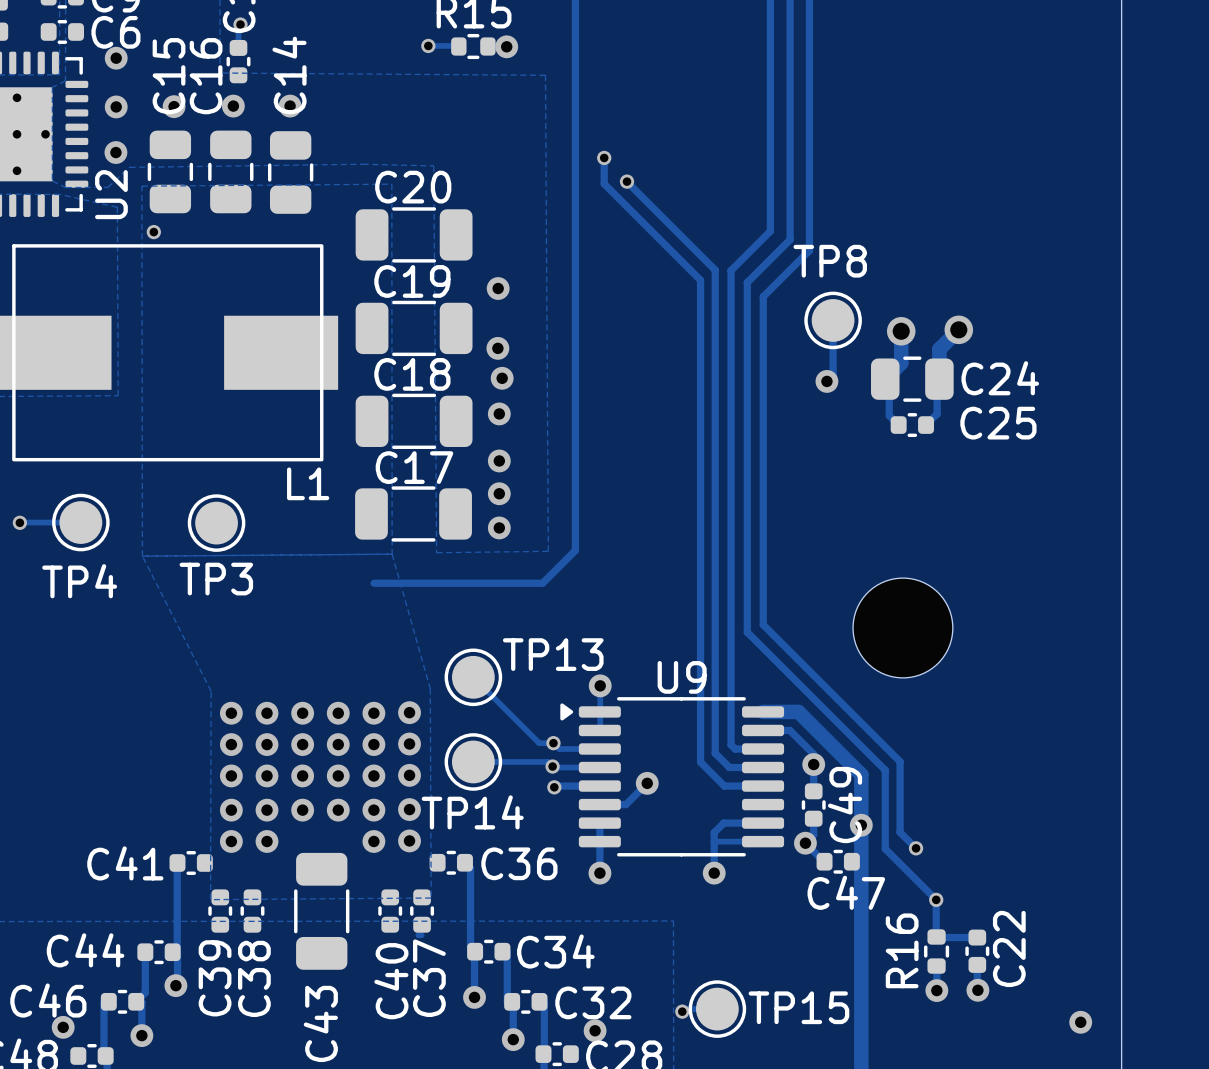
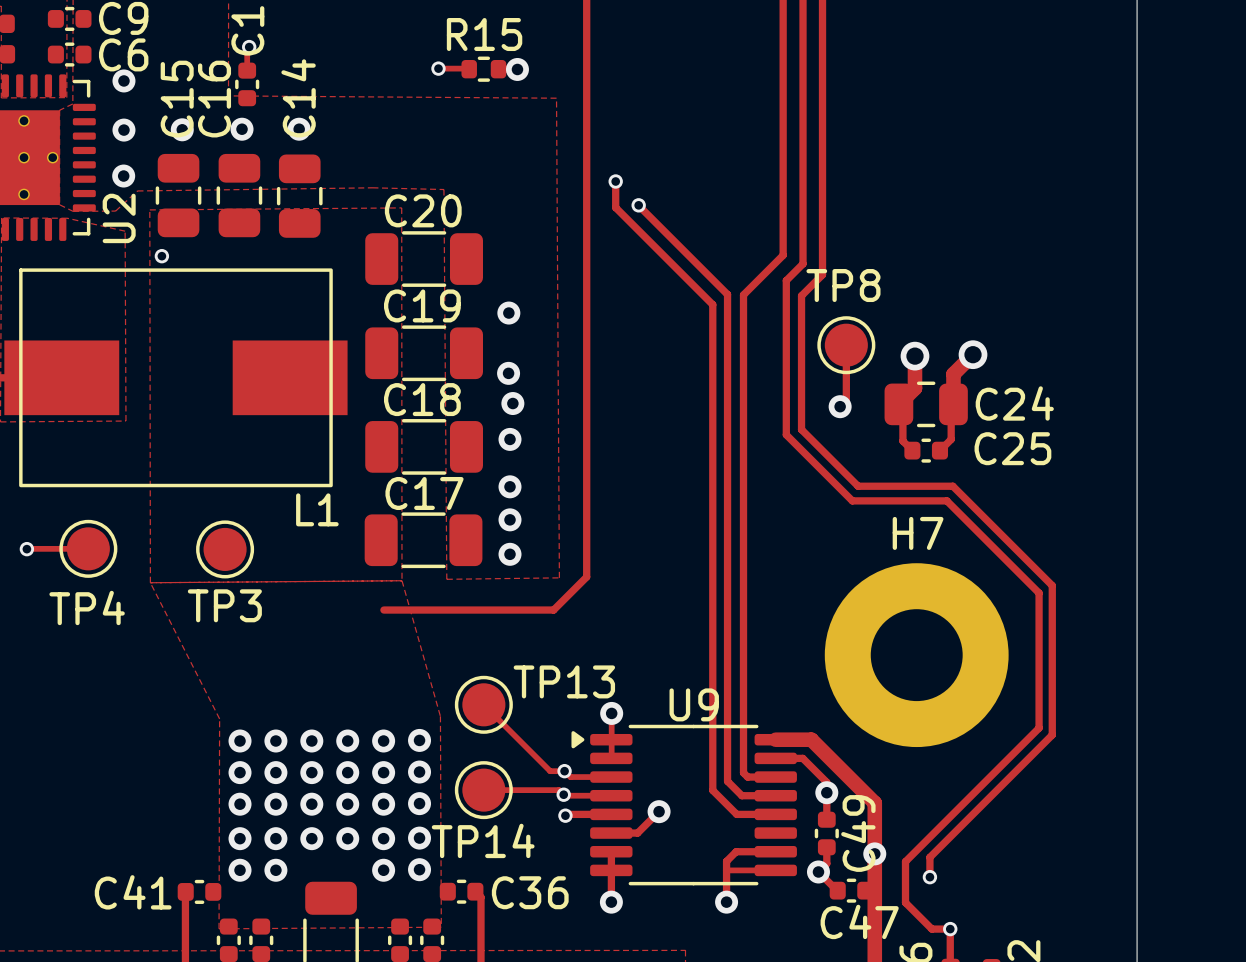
track: (773, 256) (747, 282) (747, 632) (885, 770) (885, 848) (936, 899) -> (786, 280) (786, 434) (852, 500) (946, 500) (1039, 593) (1039, 728) (905, 861) (905, 902) (931, 929) (950, 929)
track: (788, 271) (763, 296) (763, 624) (900, 761) (900, 832) (916, 848) -> (801, 295) (801, 429) (858, 486) (952, 486) (1052, 585) (1052, 734) (929, 857) (929, 877)
part: (902, 628) -> none
H7: none -> (916, 655)

